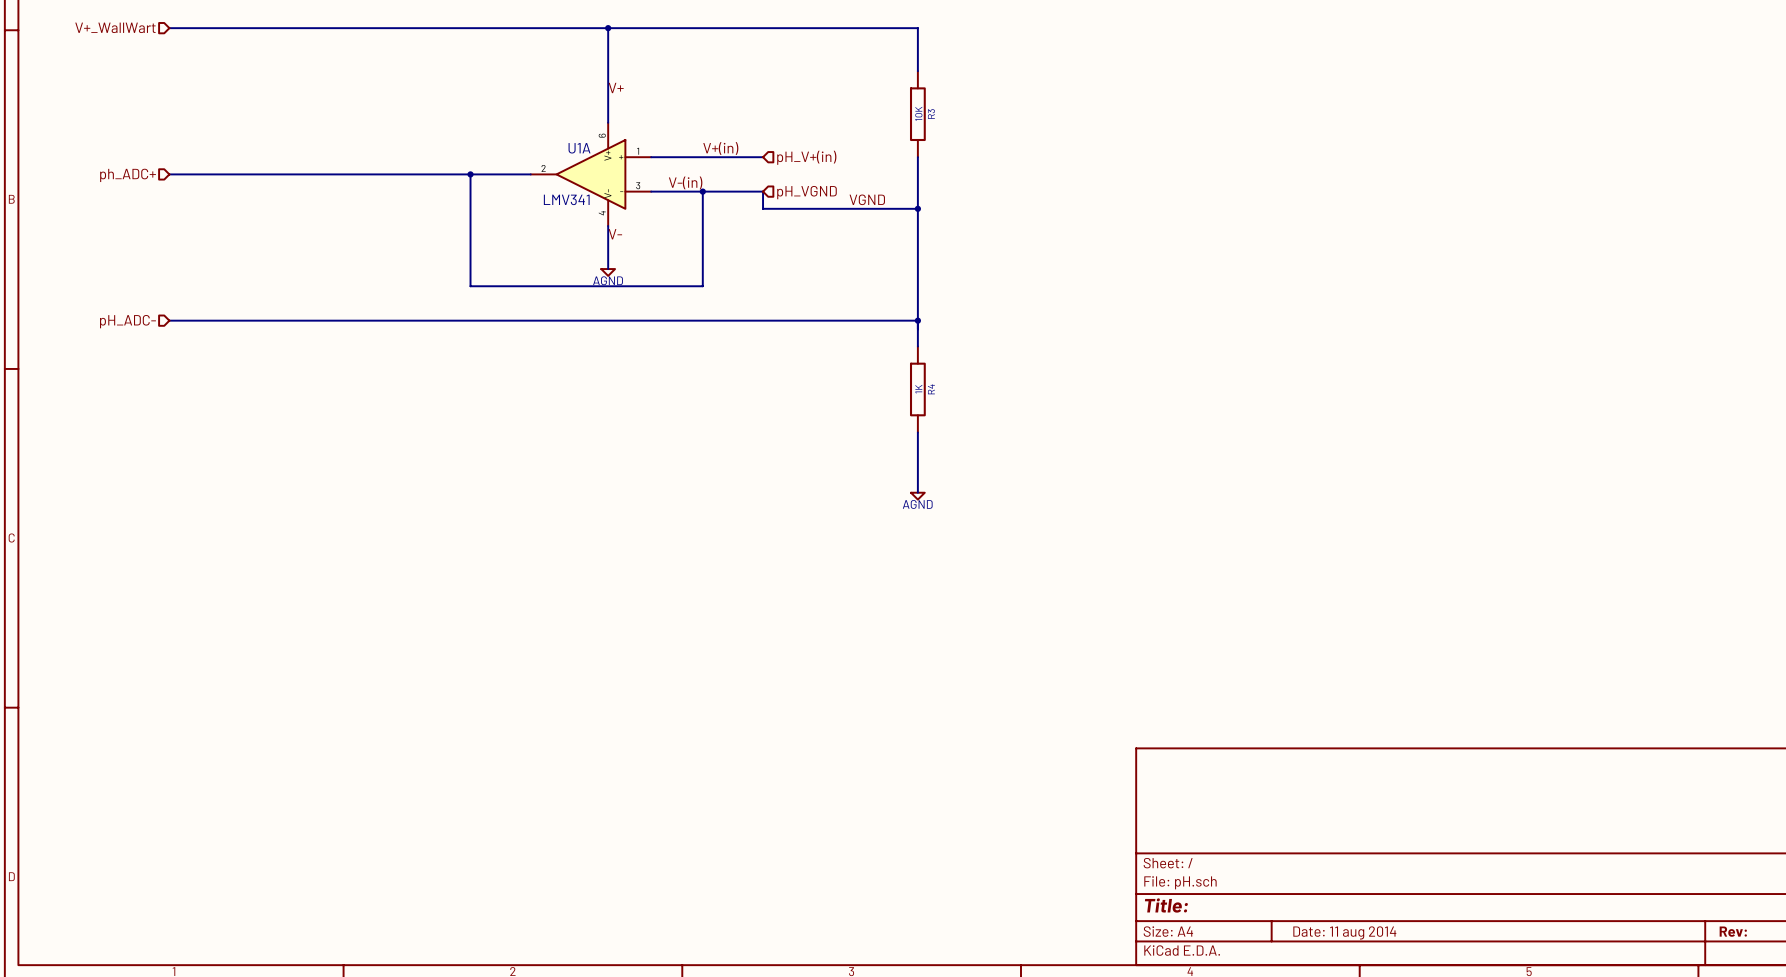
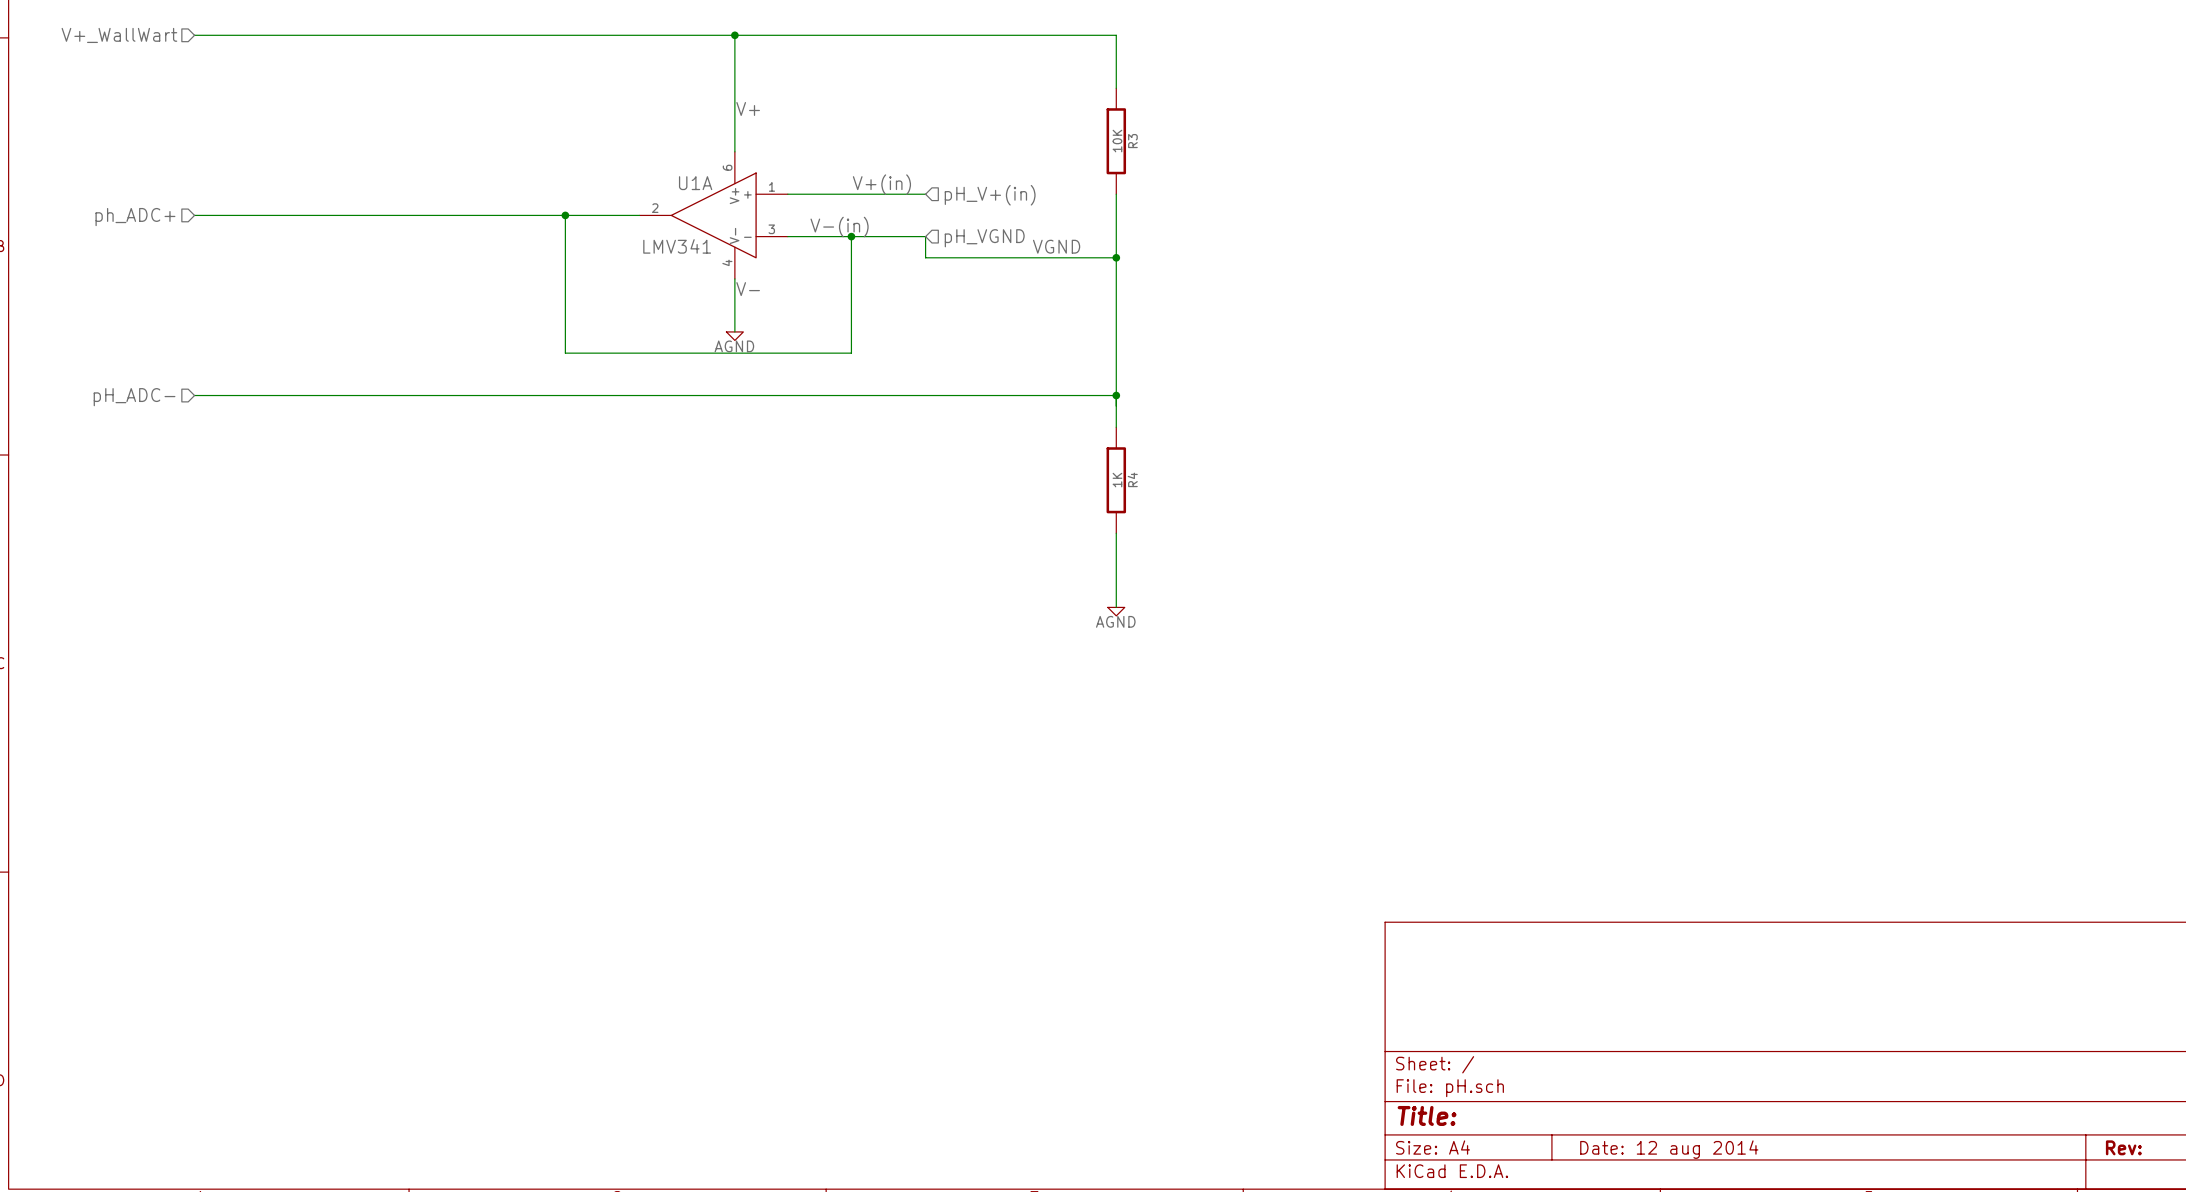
title block: Date: 11 aug 2014 (1344, 932) -> Date: 12 aug 2014 (1669, 1149)

